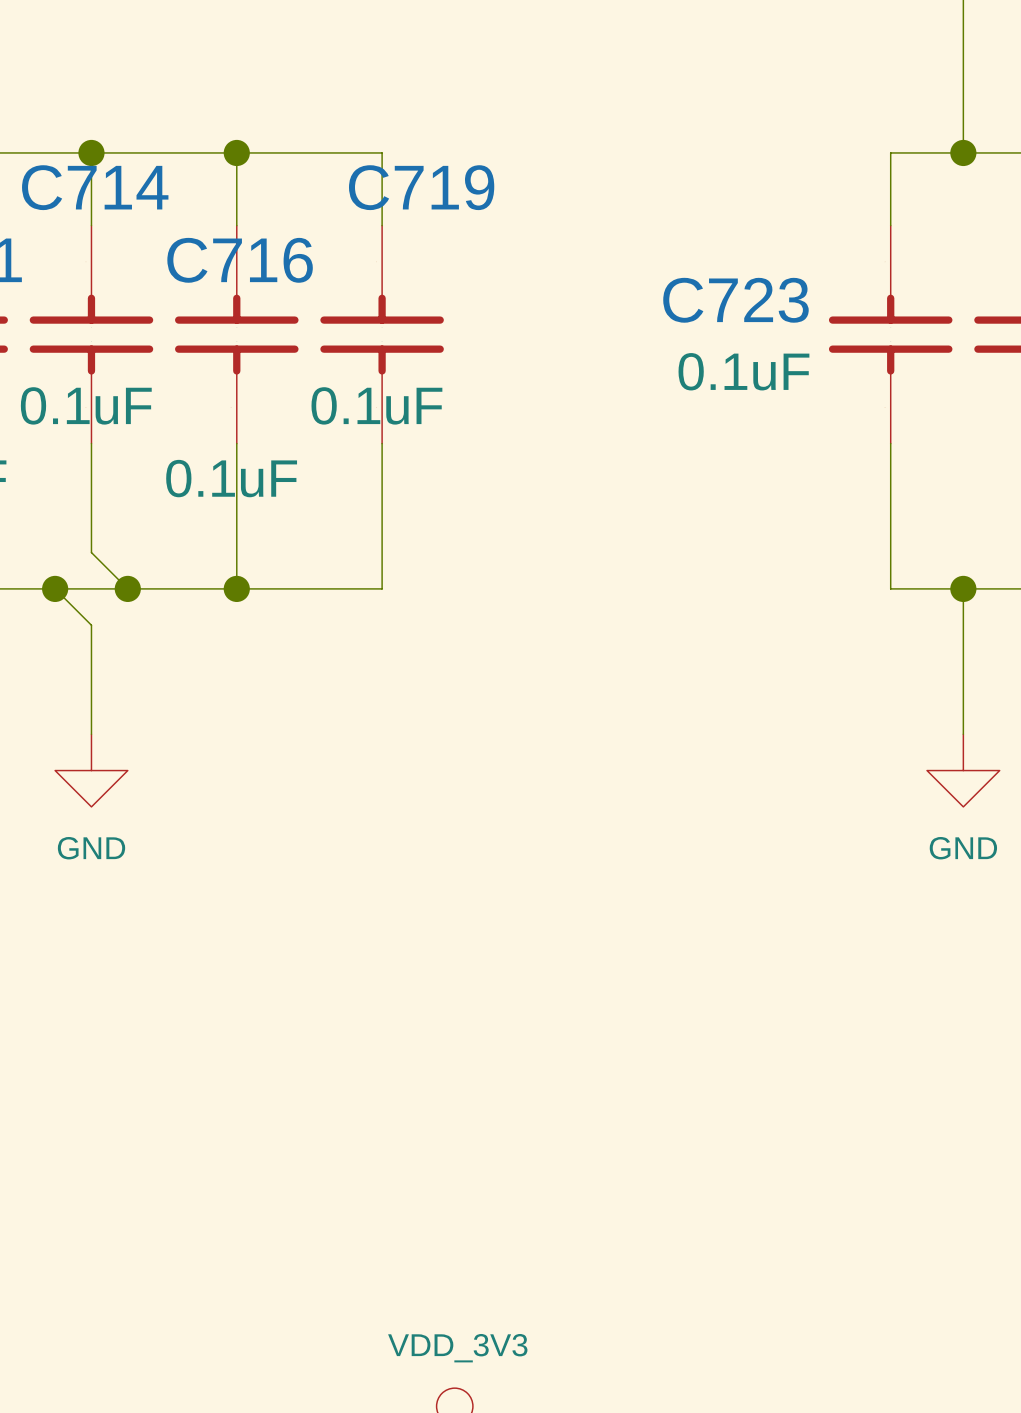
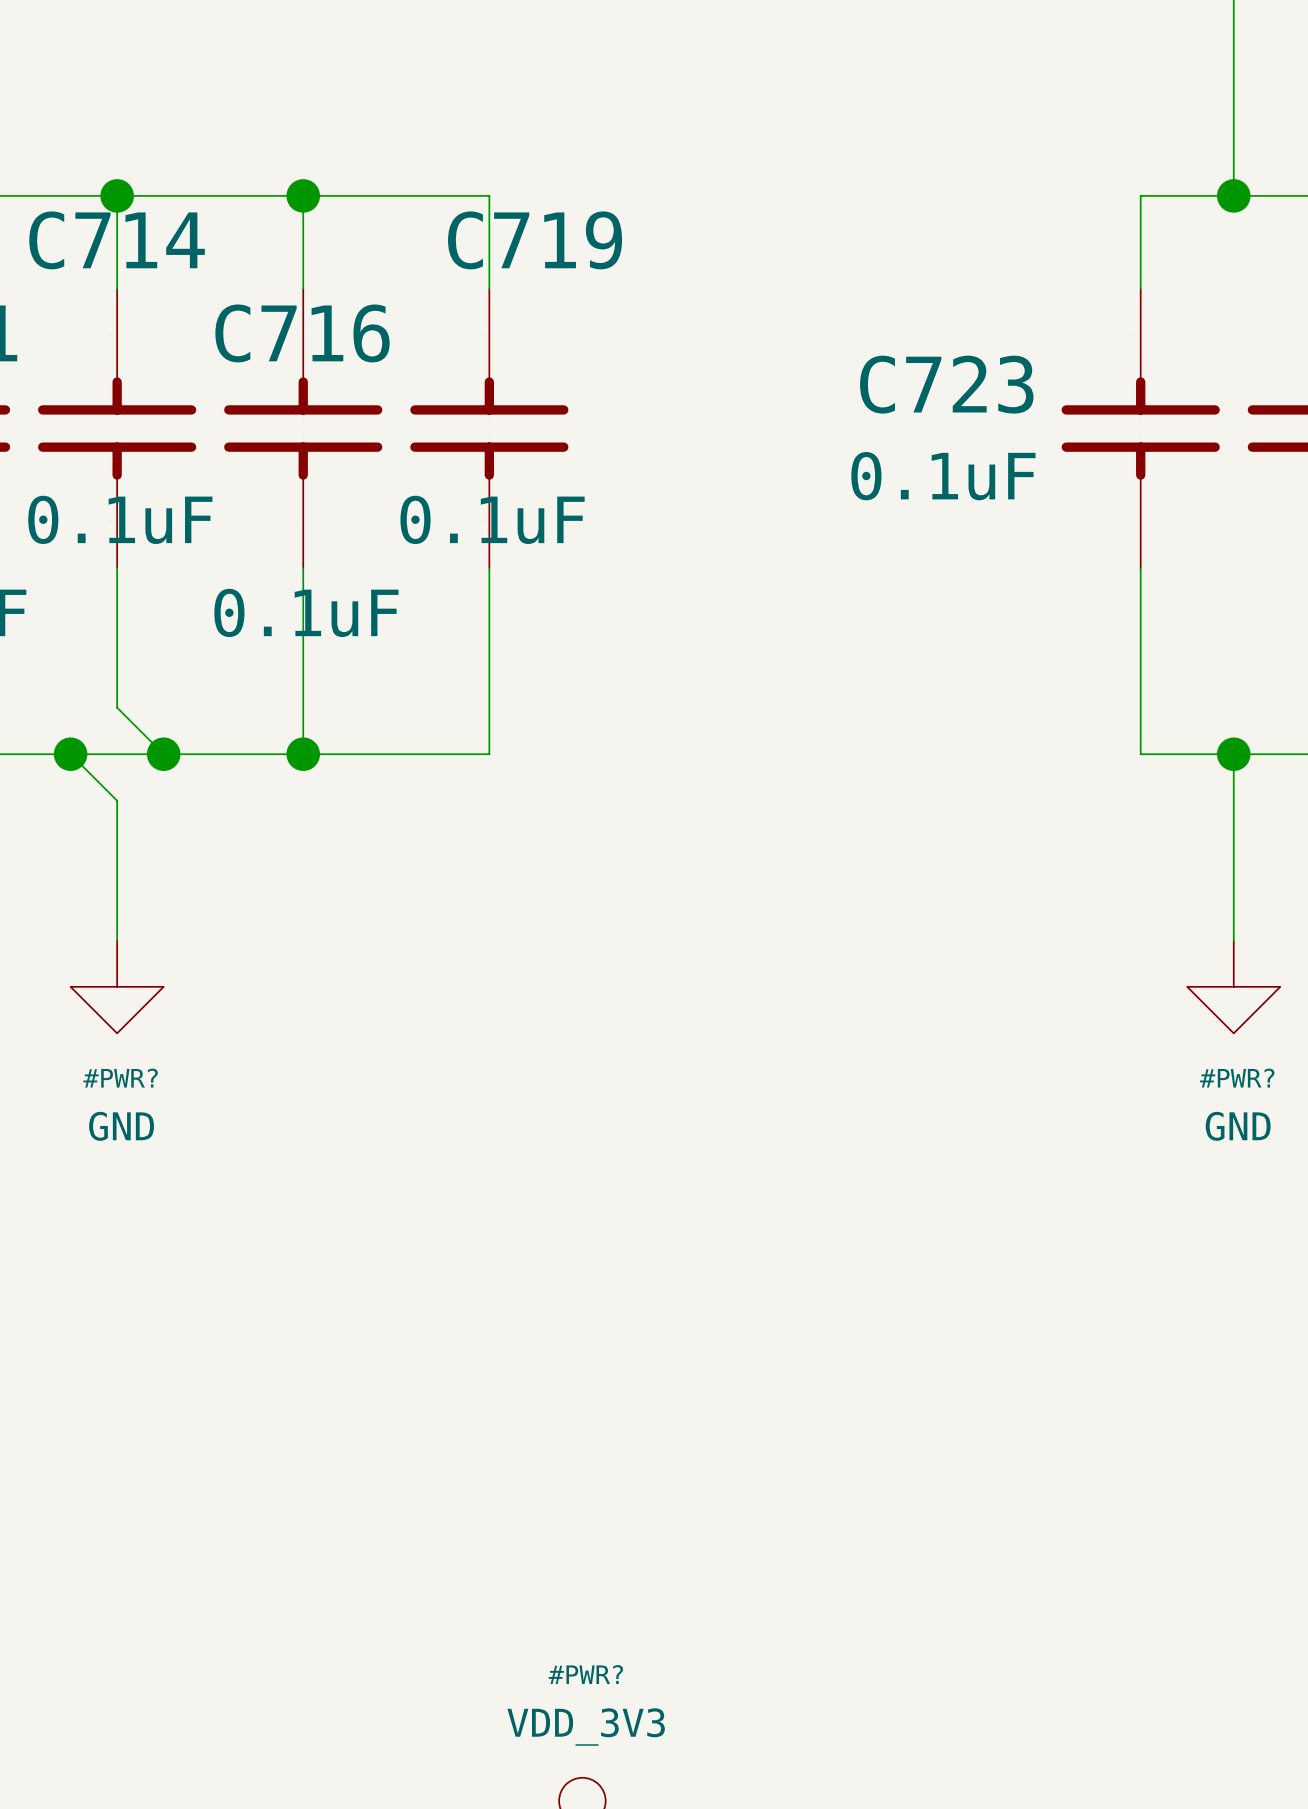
#PWR? name: none -> #PWR? (120, 1078)
#PWR? name: none -> #PWR? (1237, 1078)
#PWR? text position: GND (91, 848) -> GND (121, 1126)
#PWR? text position: GND (963, 848) -> GND (1238, 1126)
#PWR? name: none -> #PWR? (585, 1674)

